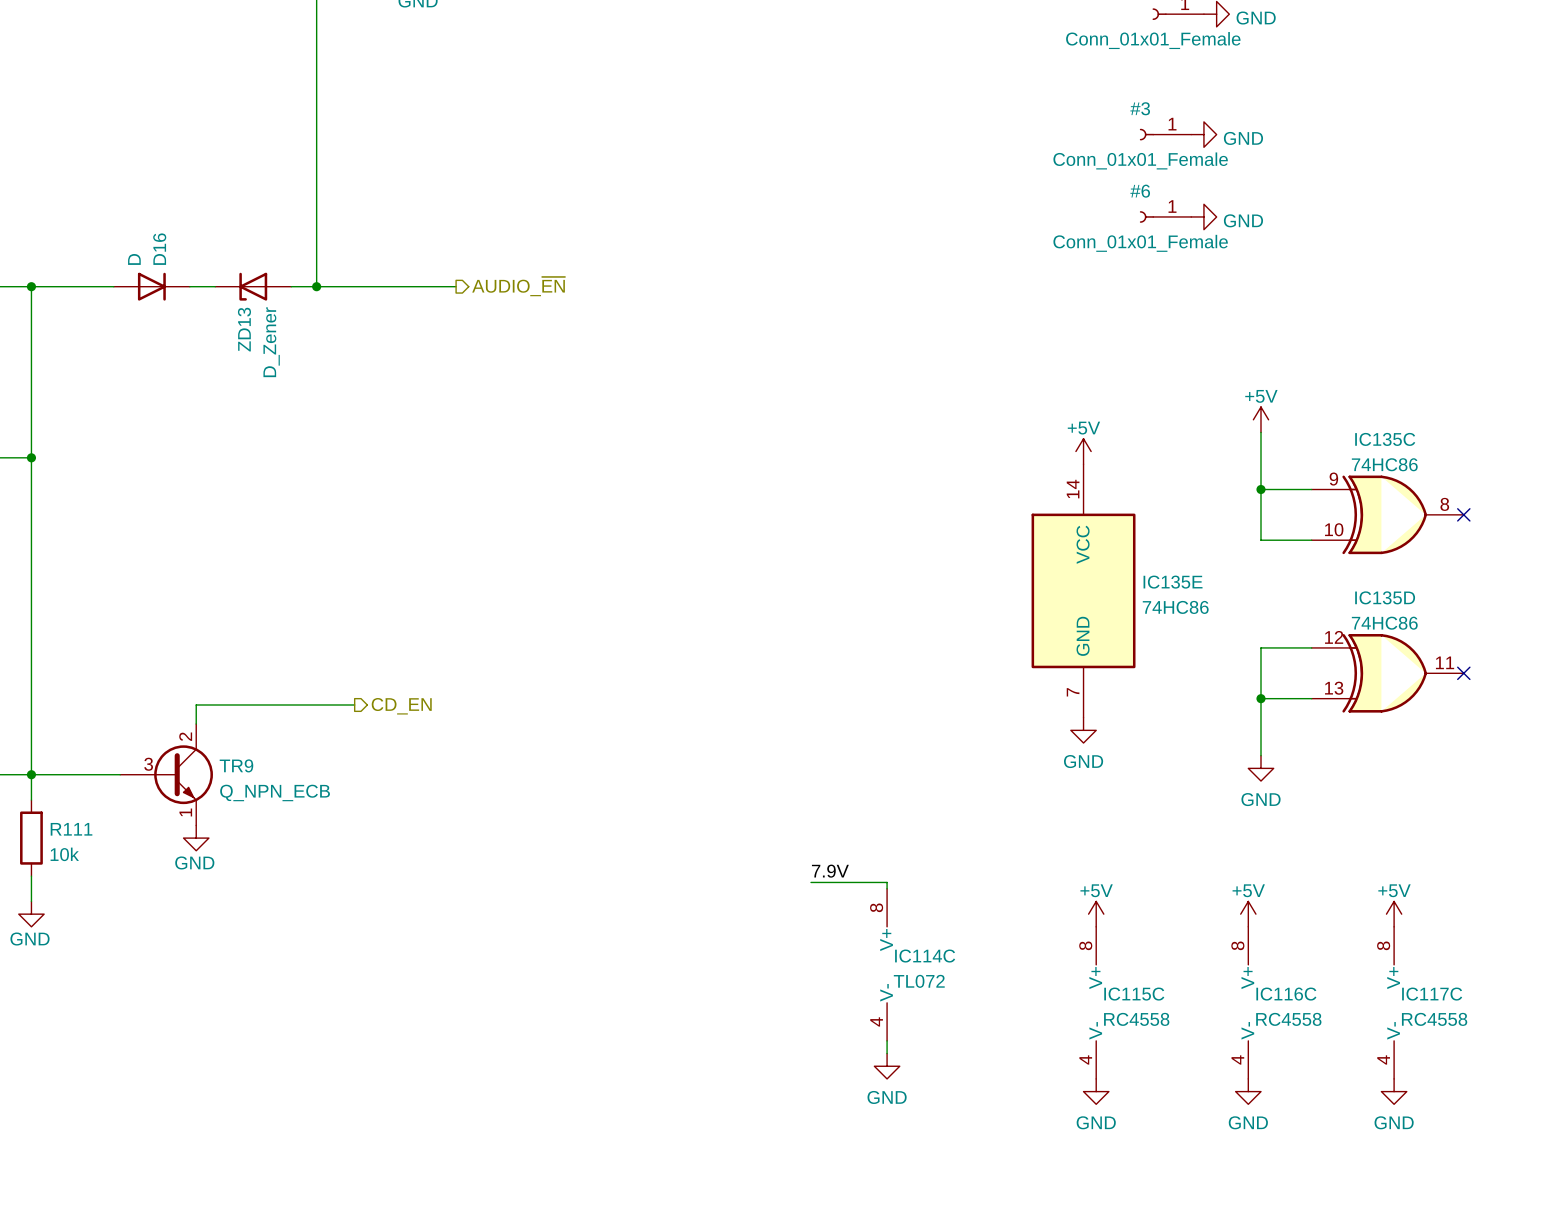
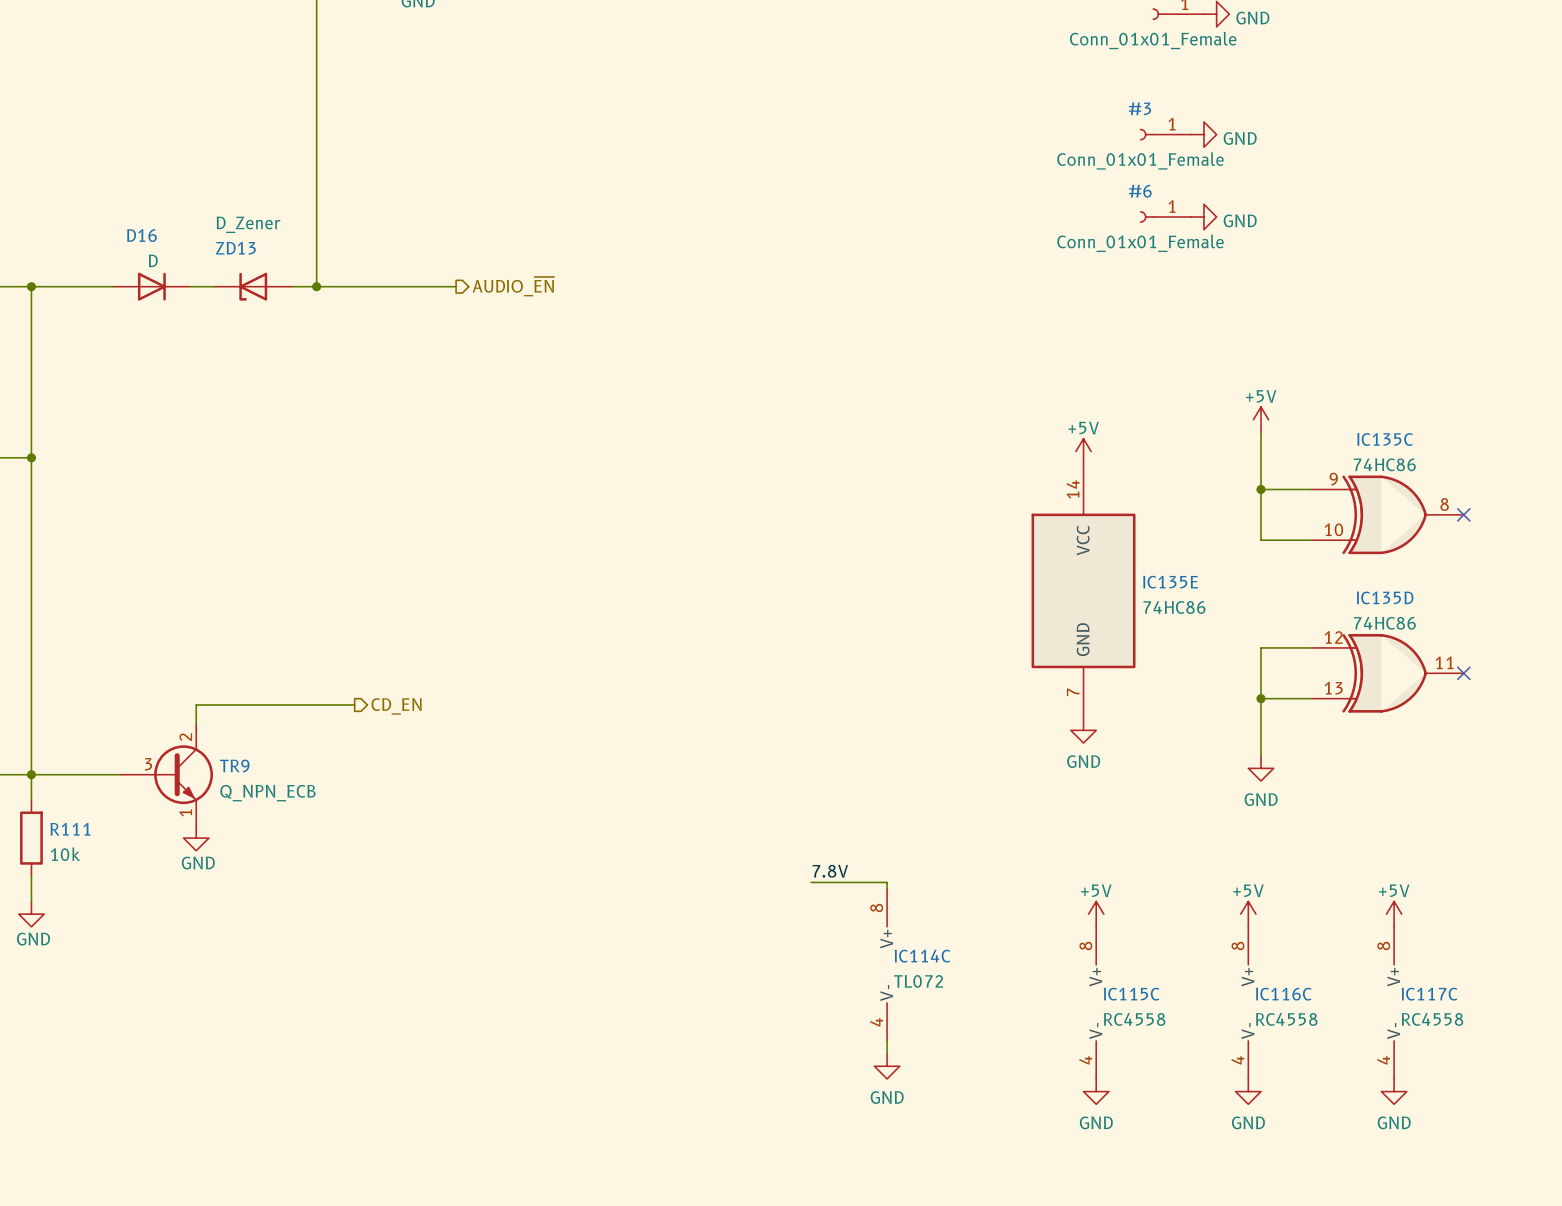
D16 name rotation: 0° (159, 249) -> 90° clockwise (141, 235)
D16 value rotation: 0° (134, 259) -> 90° clockwise (153, 260)
ZD13 name rotation: 0° (244, 329) -> 90° clockwise (235, 248)
ZD13 name position: ZD13 (244, 329) -> ZD13 (235, 248)
ZD13 value rotation: 0° (271, 342) -> 90° clockwise (248, 224)
ZD13 value position: D_Zener (271, 342) -> D_Zener (248, 224)
label: 7.9V (830, 871) -> 7.8V (830, 871)

